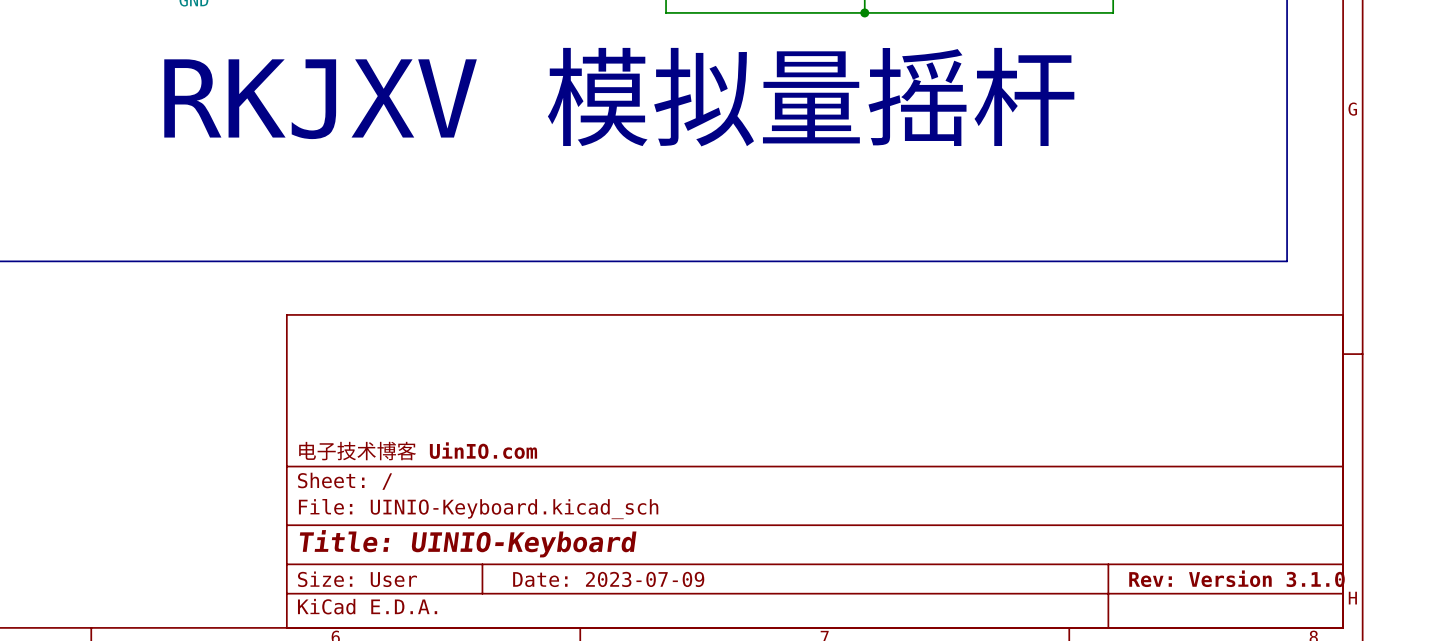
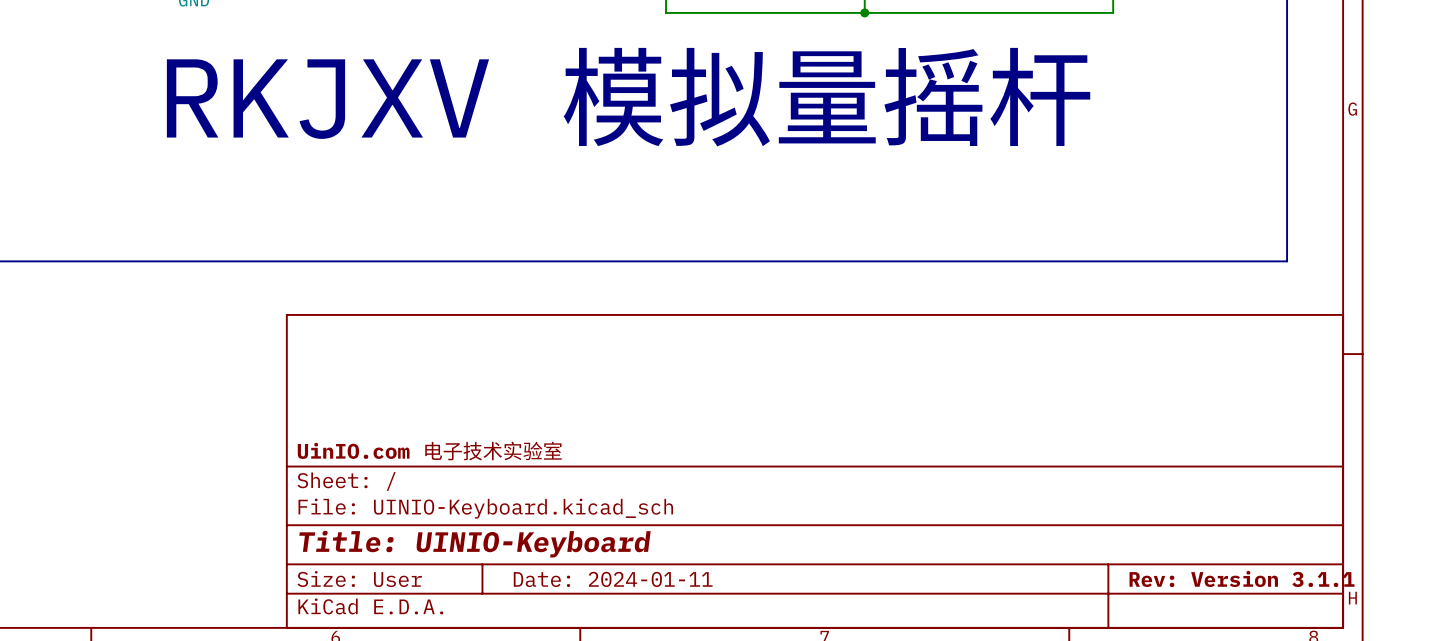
title block: 电子技术博客 UinIO.com (418, 451) -> UinIO.com 电子技术实验室 (429, 451)
title block: Rev: Version 3.1.0 (1237, 578) -> Rev: Version 3.1.1 (1242, 579)
title block: Date: 2023-07-09 (608, 579) -> Date: 2024-01-11 (613, 579)

